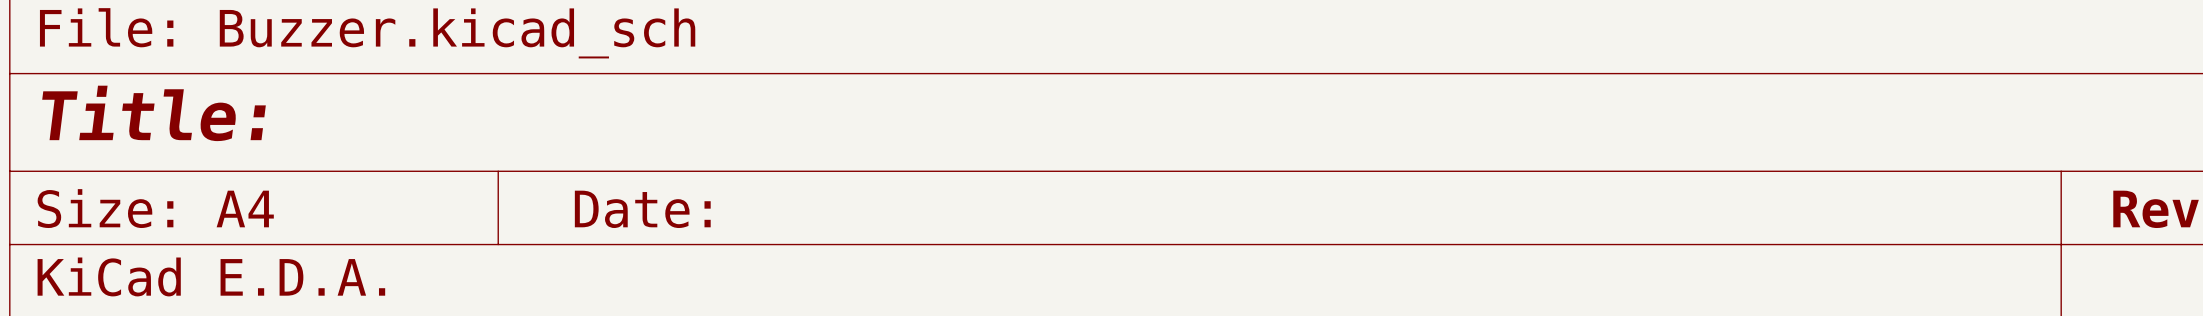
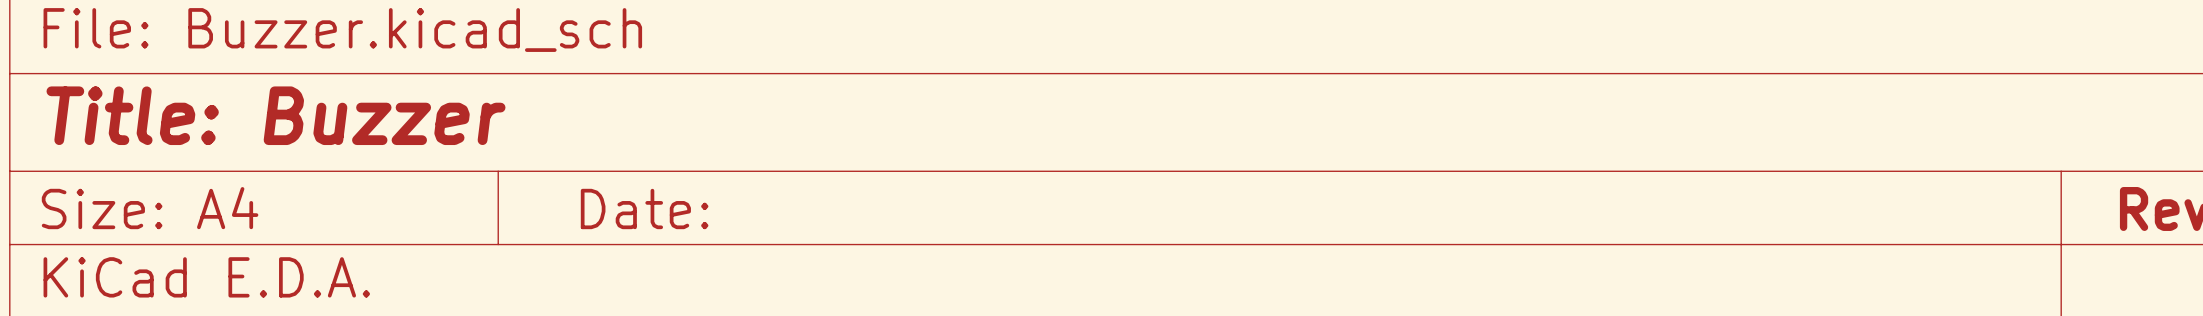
title block: Title: (154, 113) -> Title: Buzzer (276, 115)

